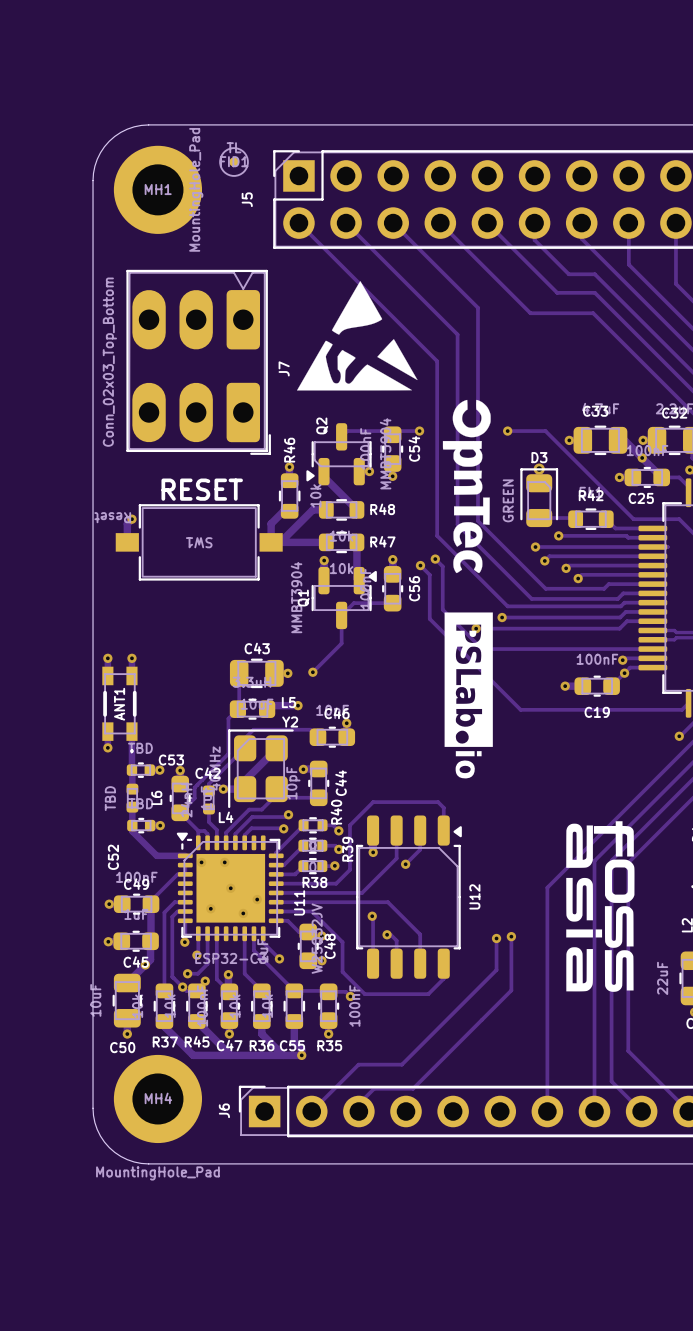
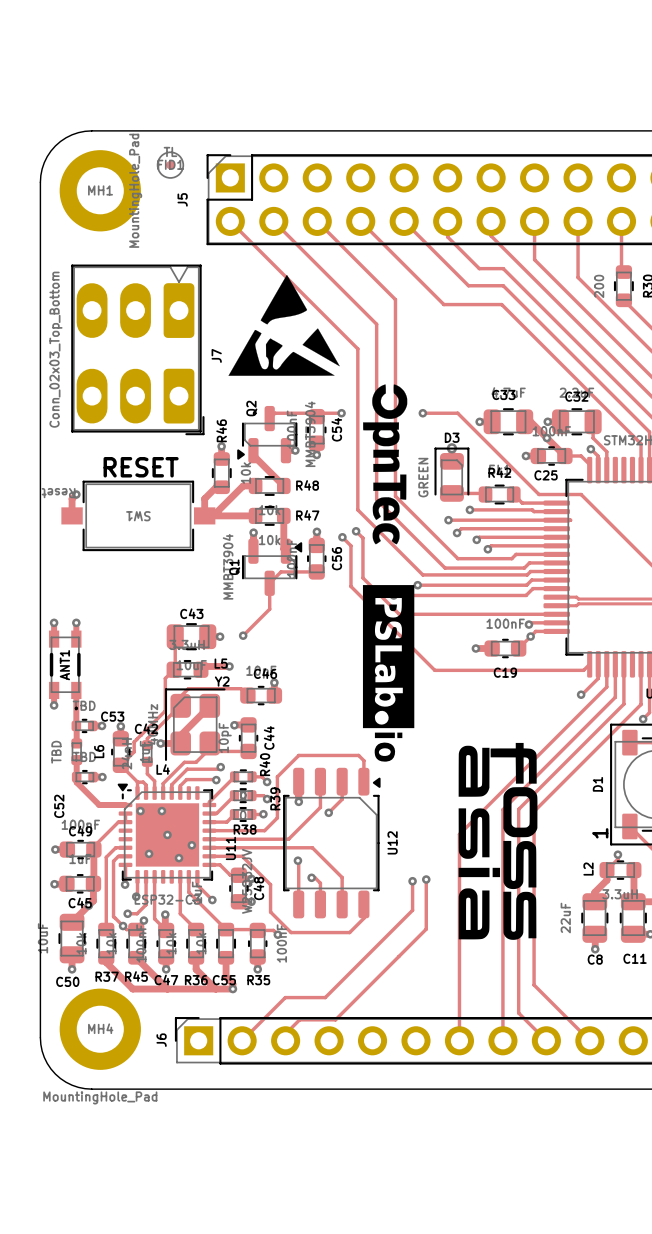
drawing shape: [444, 612, 493, 779] -> [362, 585, 415, 762]
drawing shape: [566, 821, 635, 992] -> [458, 742, 538, 940]

